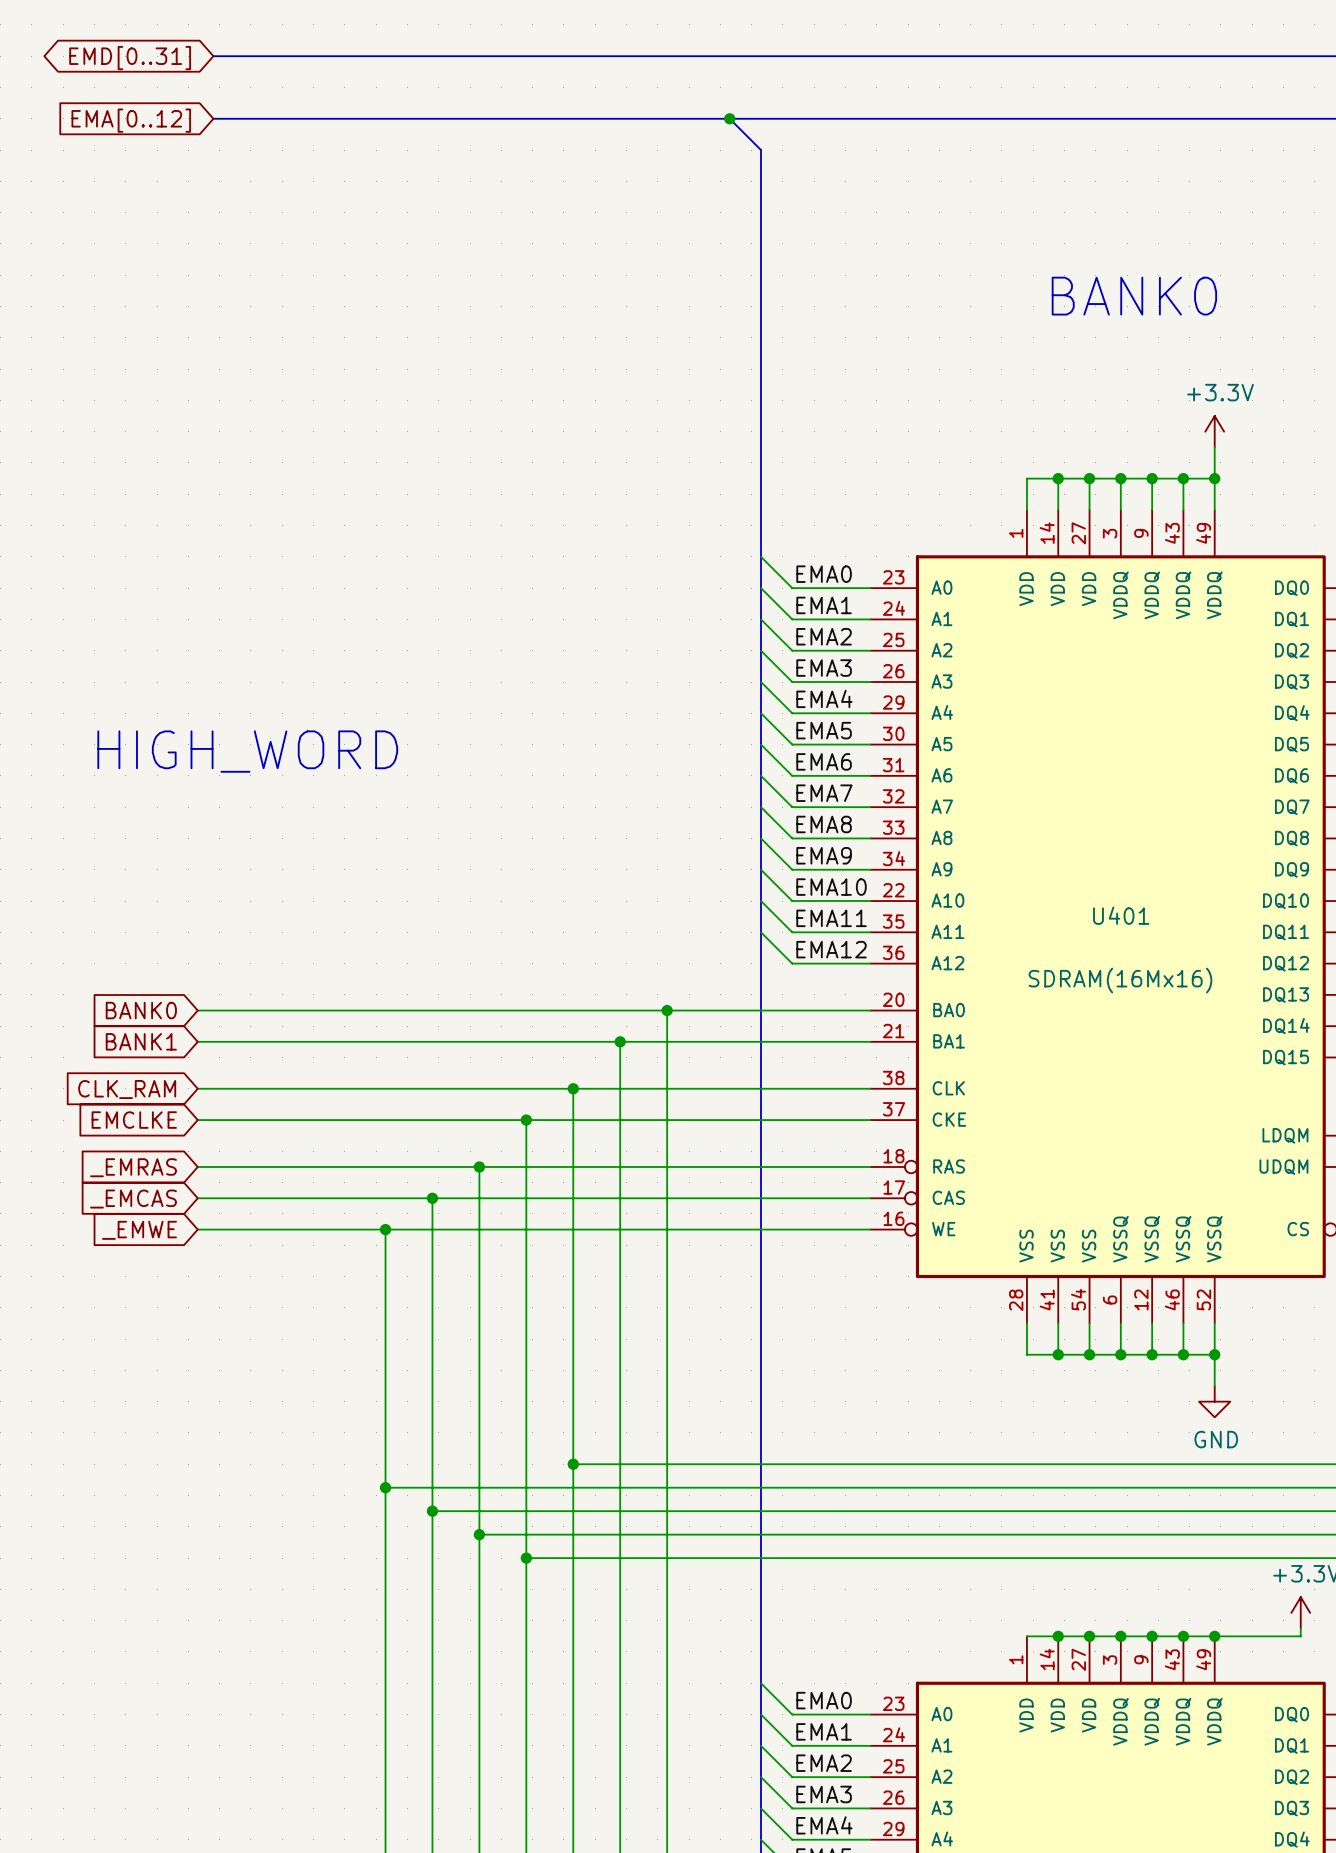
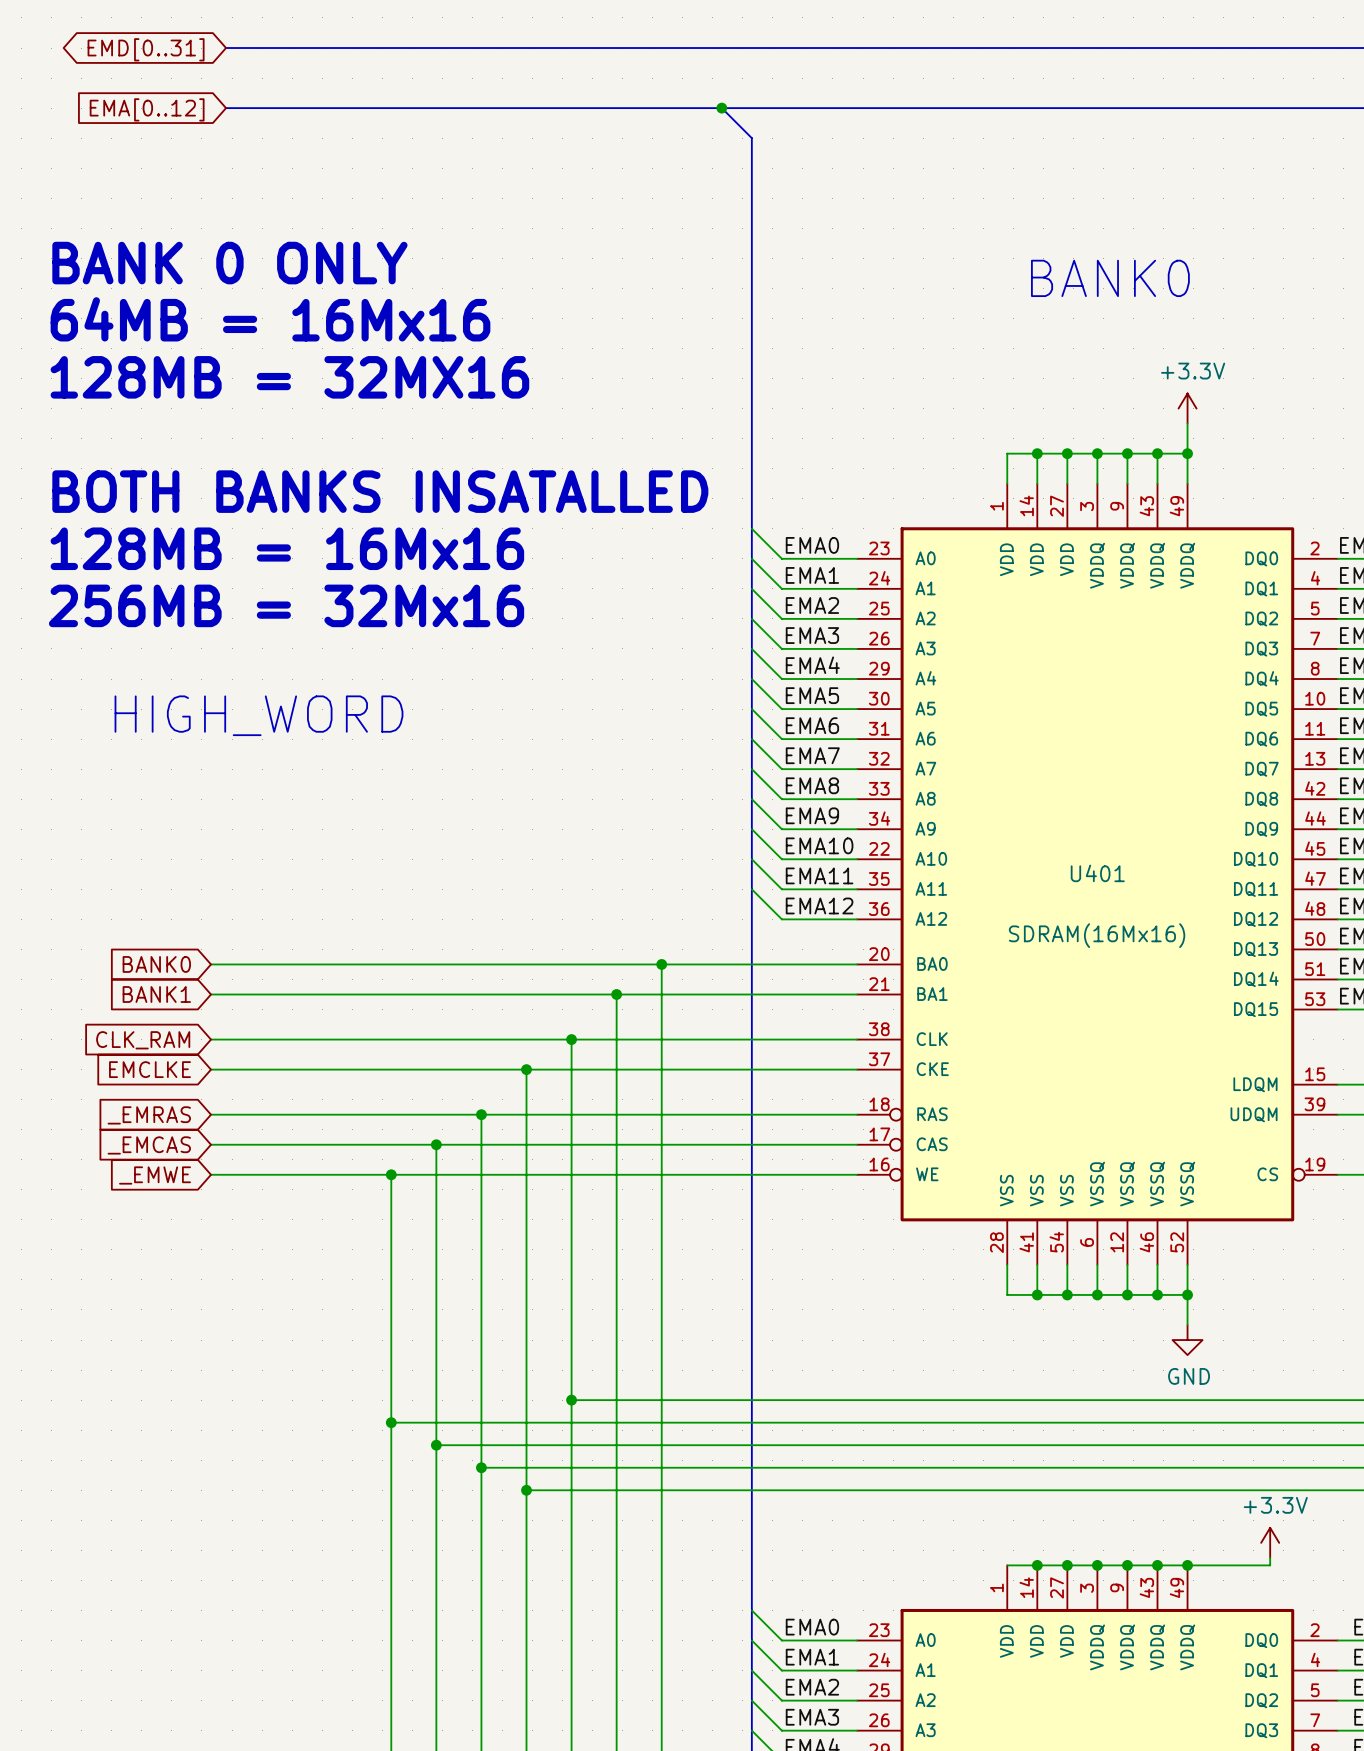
text: none -> BANK 0 ONLY (229, 263)
text: none -> 64MB = 16Mx16 (270, 319)
text: none -> 128MB = 32MX16 (289, 377)
text: none -> BOTH BANKS INSATALLED (380, 491)
text: none -> 128MB = 16Mx16 (287, 548)
text: none -> 256MB = 32Mx16 (286, 605)

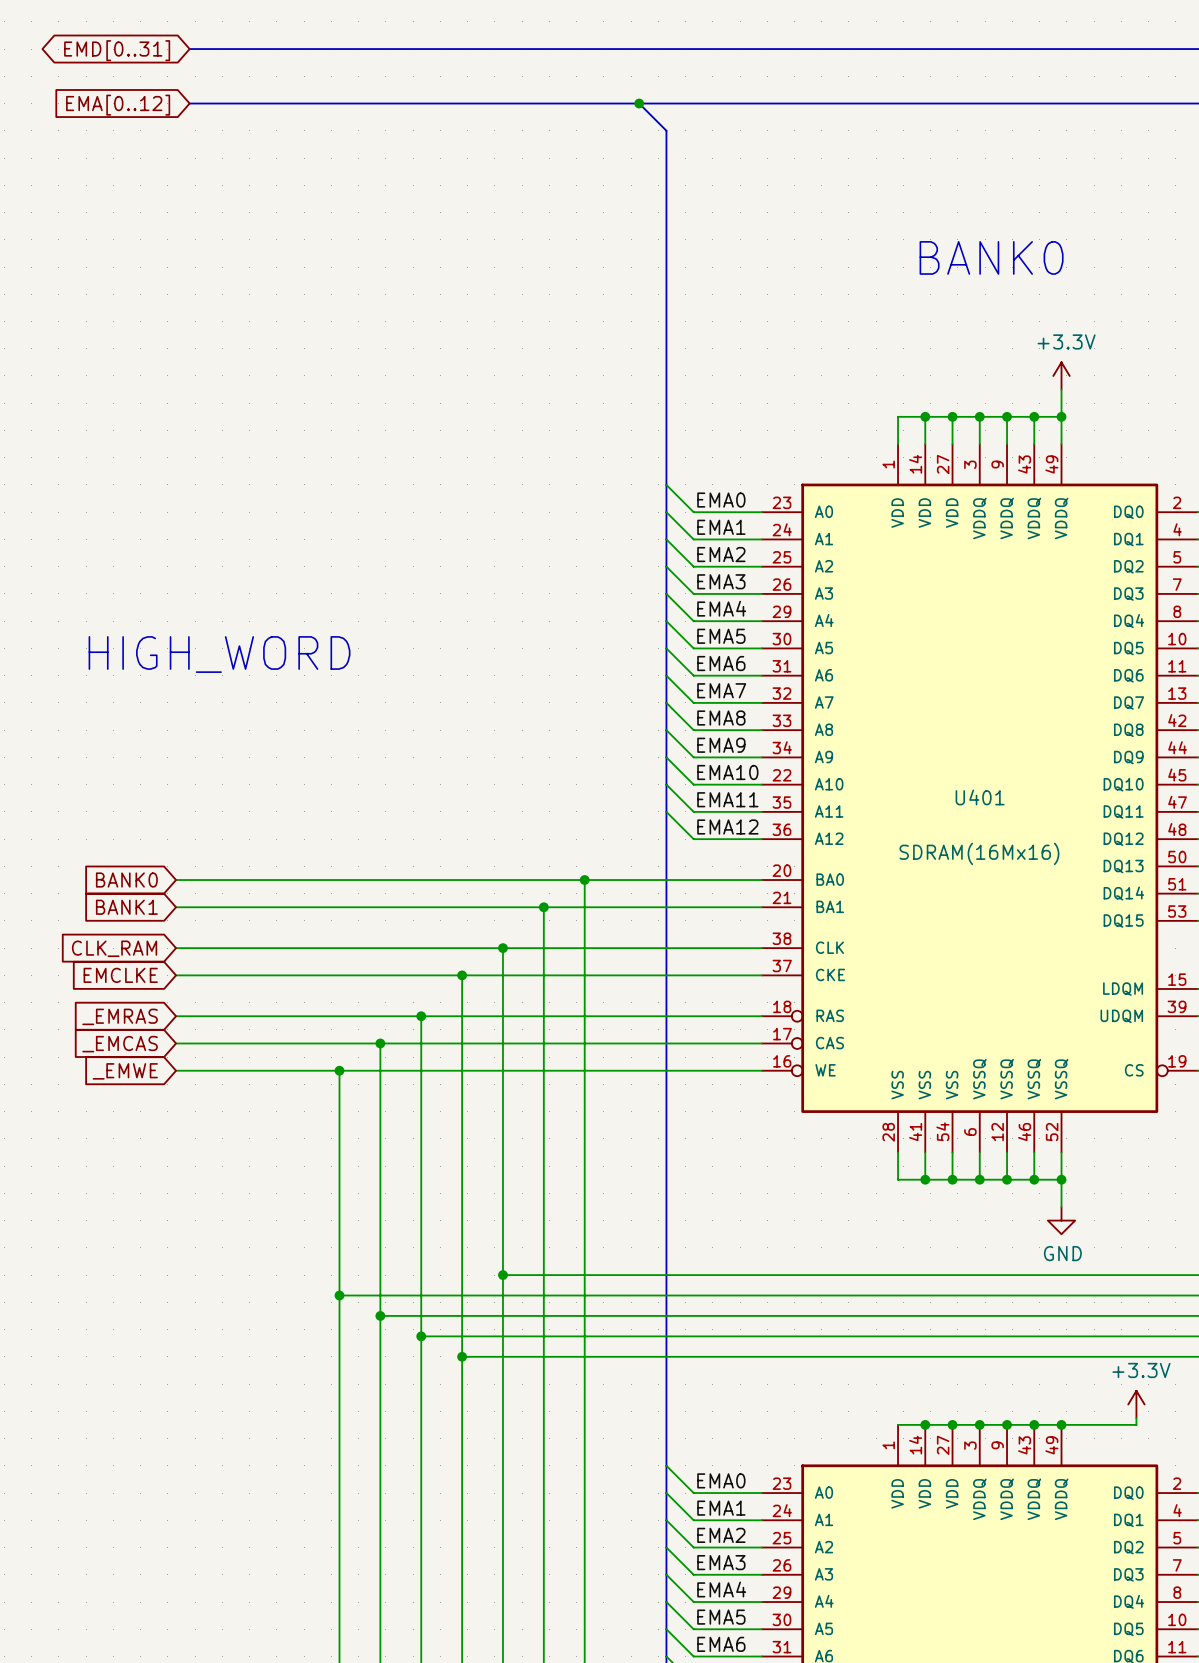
text: BANK 0 ONLY (229, 263) -> none
text: 64MB = 16Mx16 (270, 319) -> none
text: 128MB = 32MX16 (289, 377) -> none
text: BOTH BANKS INSATALLED (380, 491) -> none
text: 128MB = 16Mx16 (287, 548) -> none
text: 256MB = 32Mx16 (286, 605) -> none

